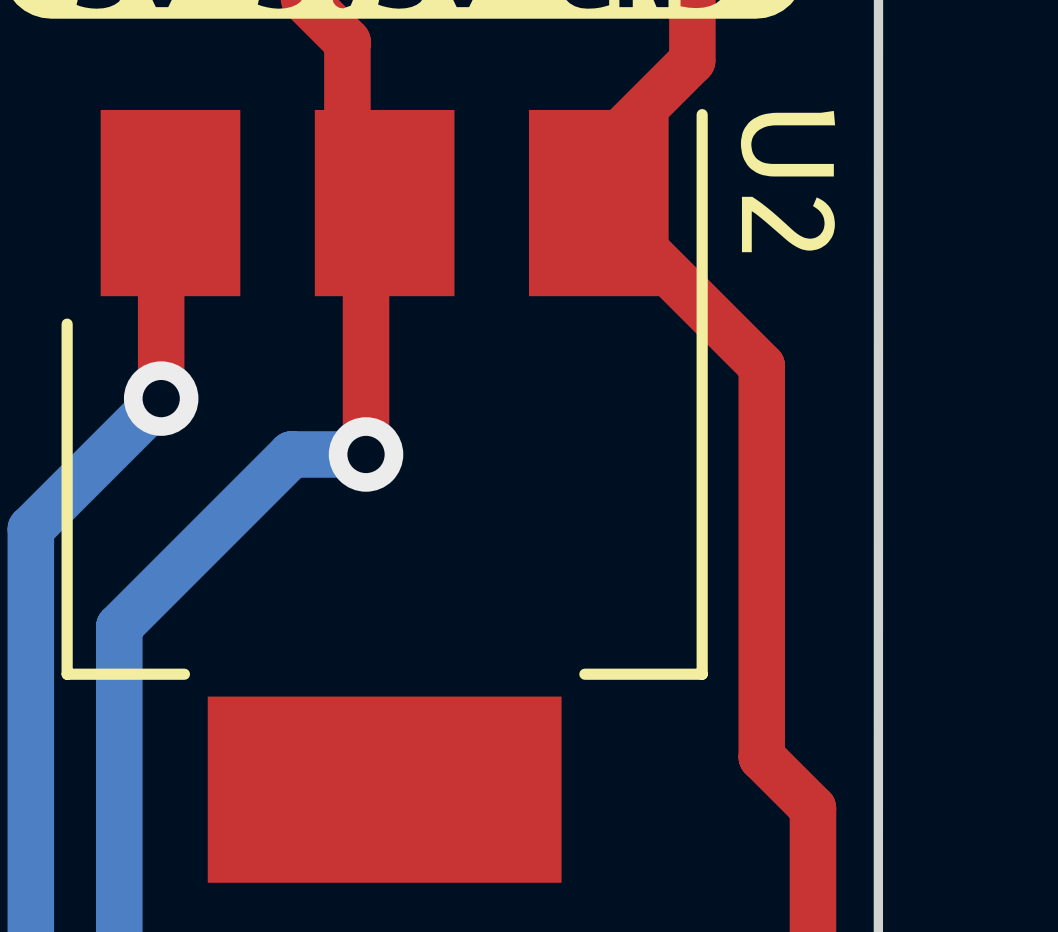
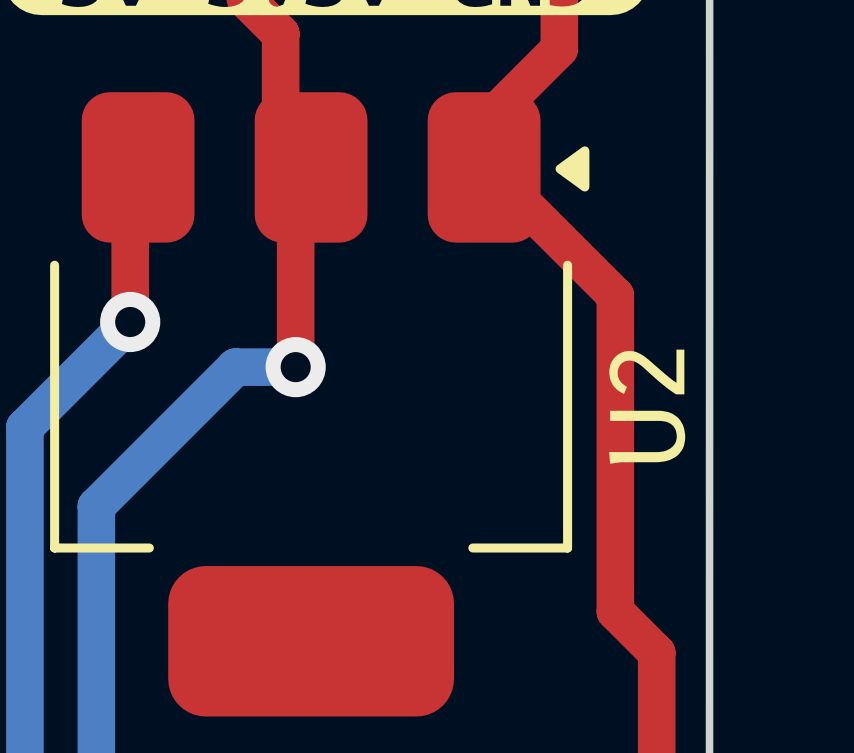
U2 footprint: [61, 109, 708, 883] -> [50, 92, 590, 717]
U2 name rotation: 0° (788, 181) -> 180° (647, 406)
U2 name position: U2 (788, 181) -> U2 (647, 406)

